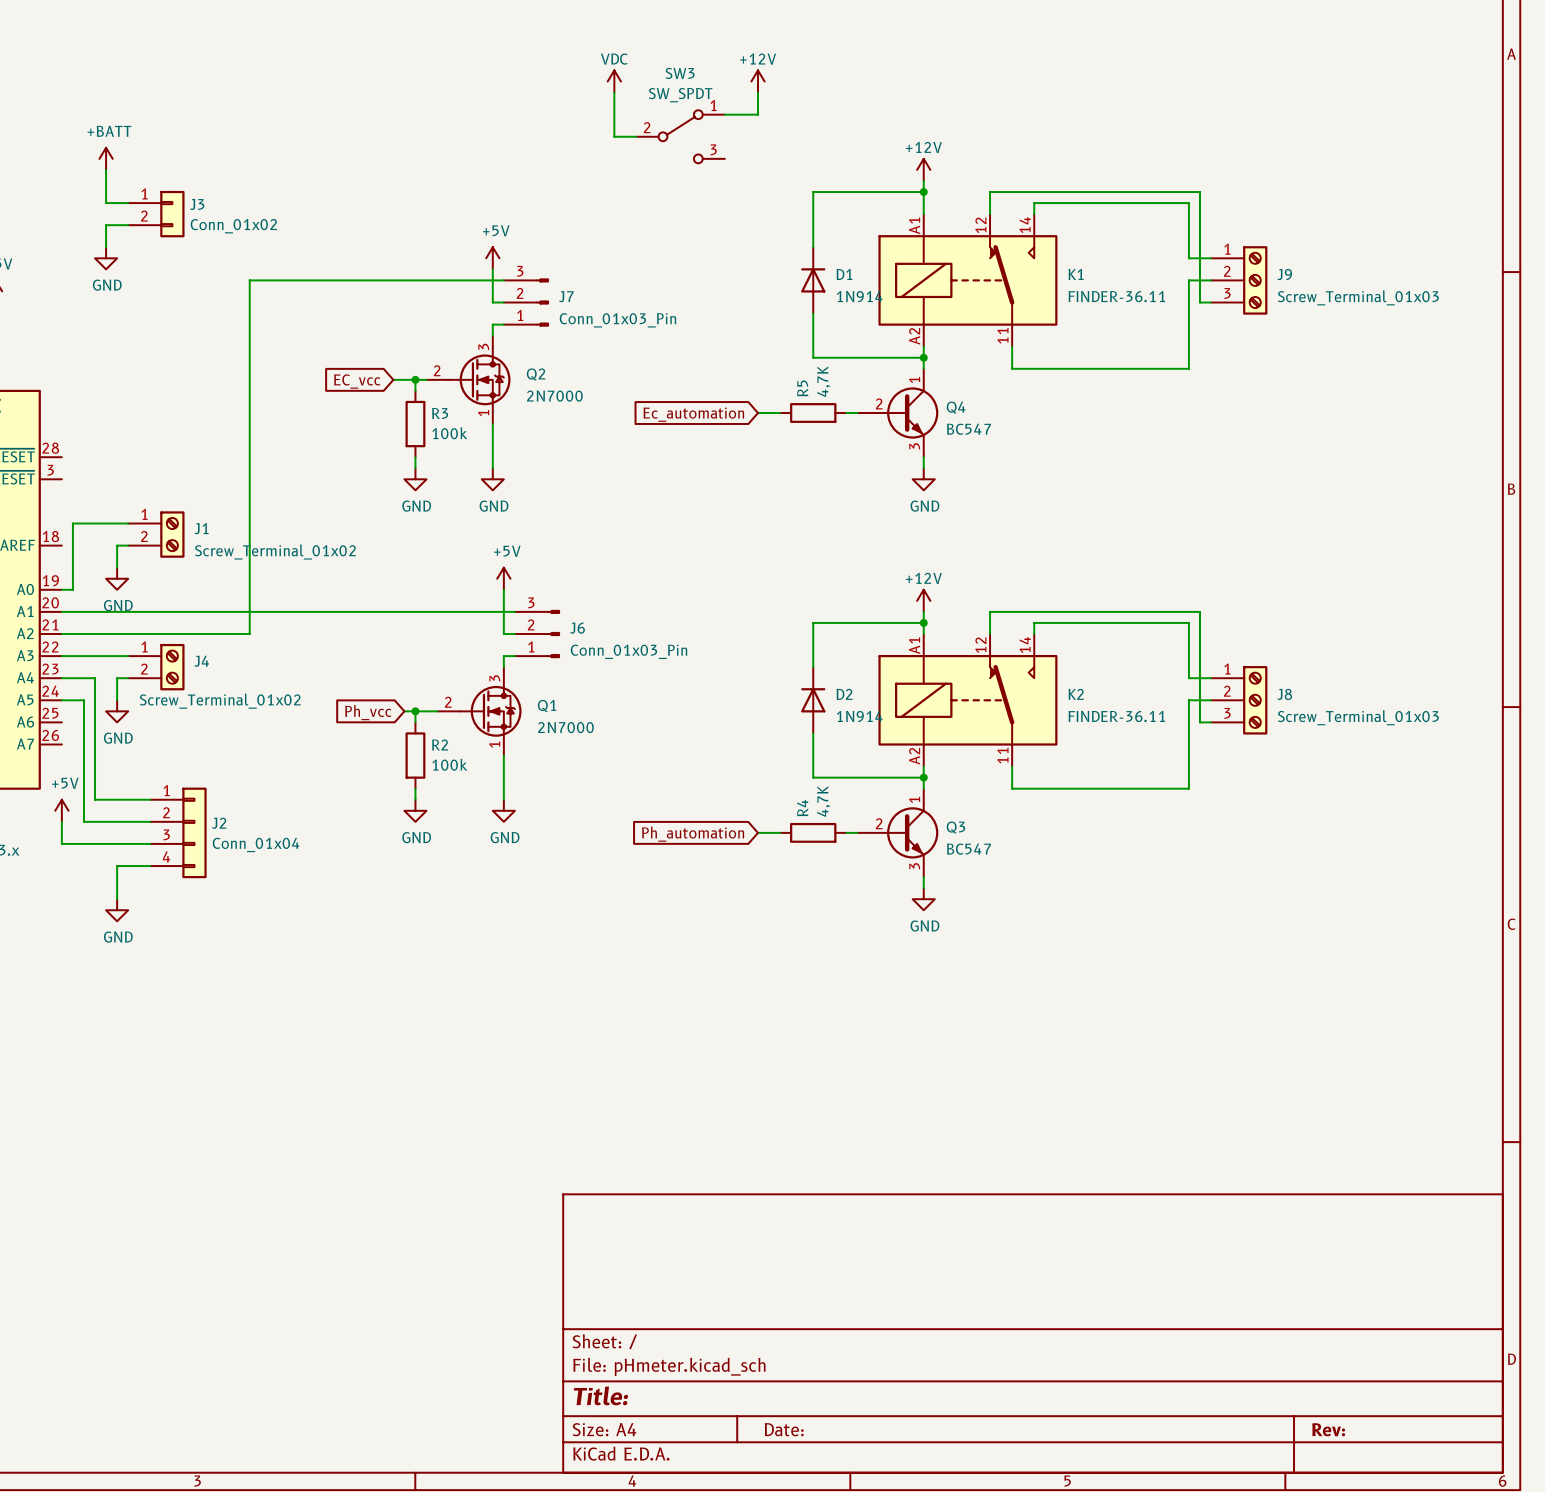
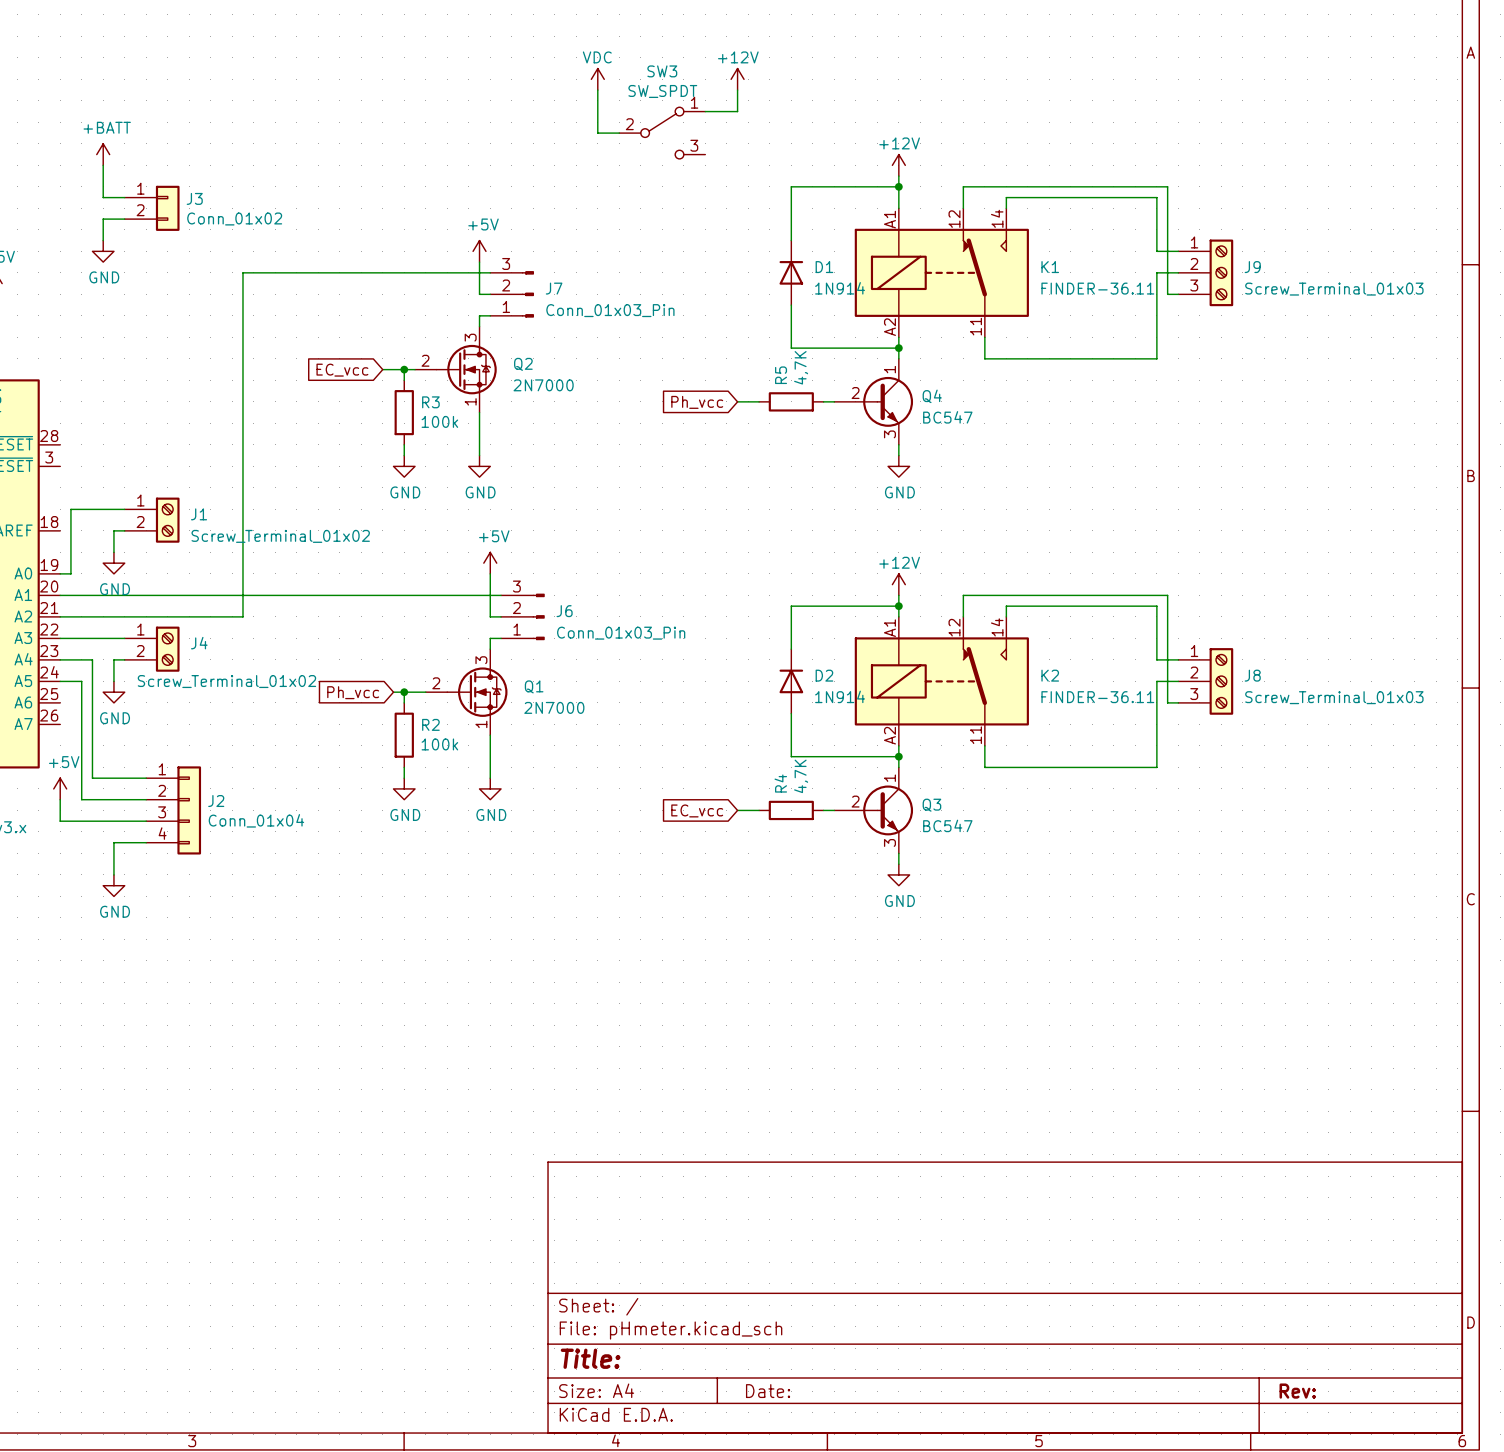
global label: Ec_automation (693, 414) -> Ph_vcc (697, 402)
global label: Ph_automation (693, 834) -> EC_vcc (697, 810)

